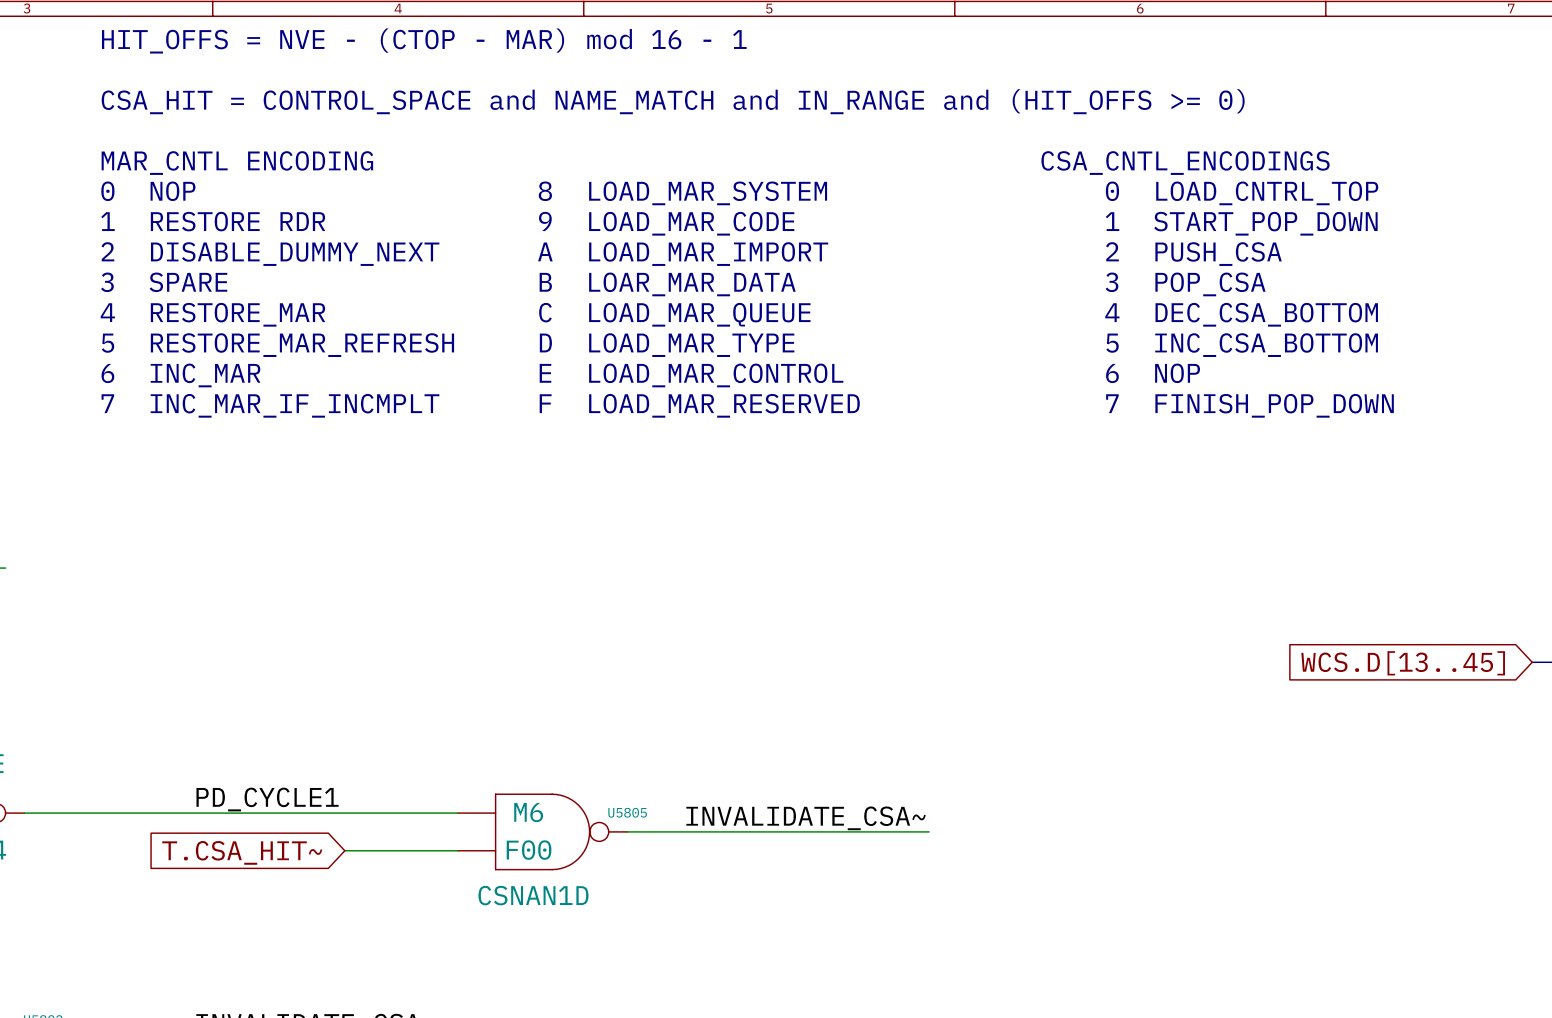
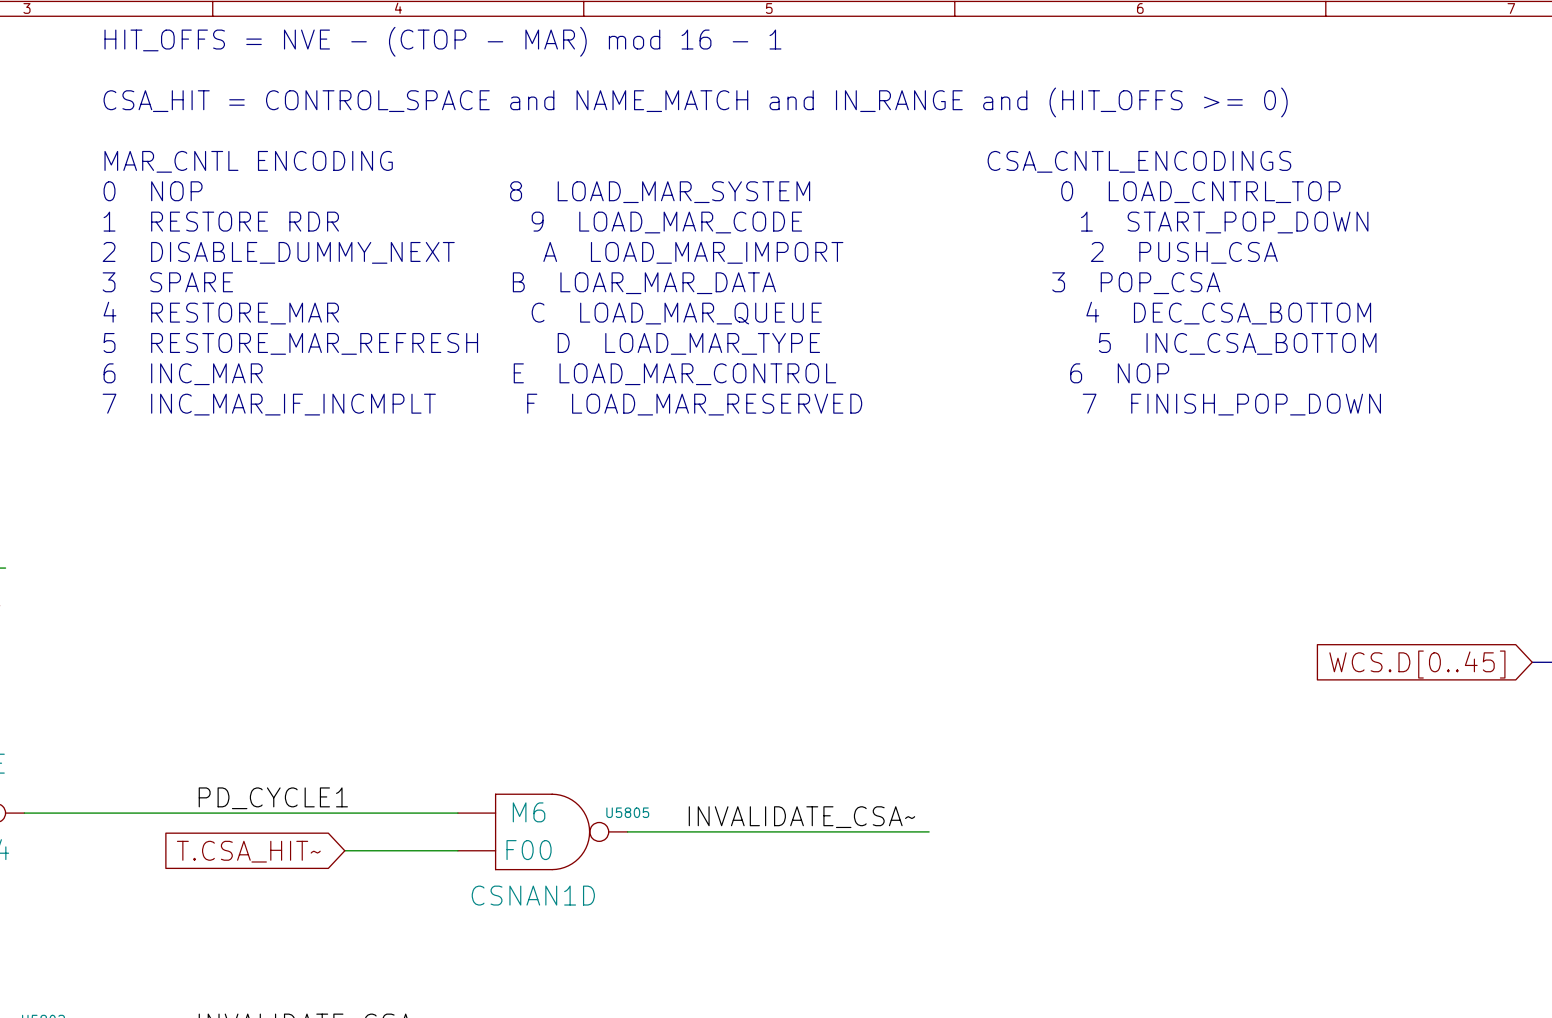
global label: WCS.D[13..45] (1403, 663) -> WCS.D[0..45] (1417, 664)

